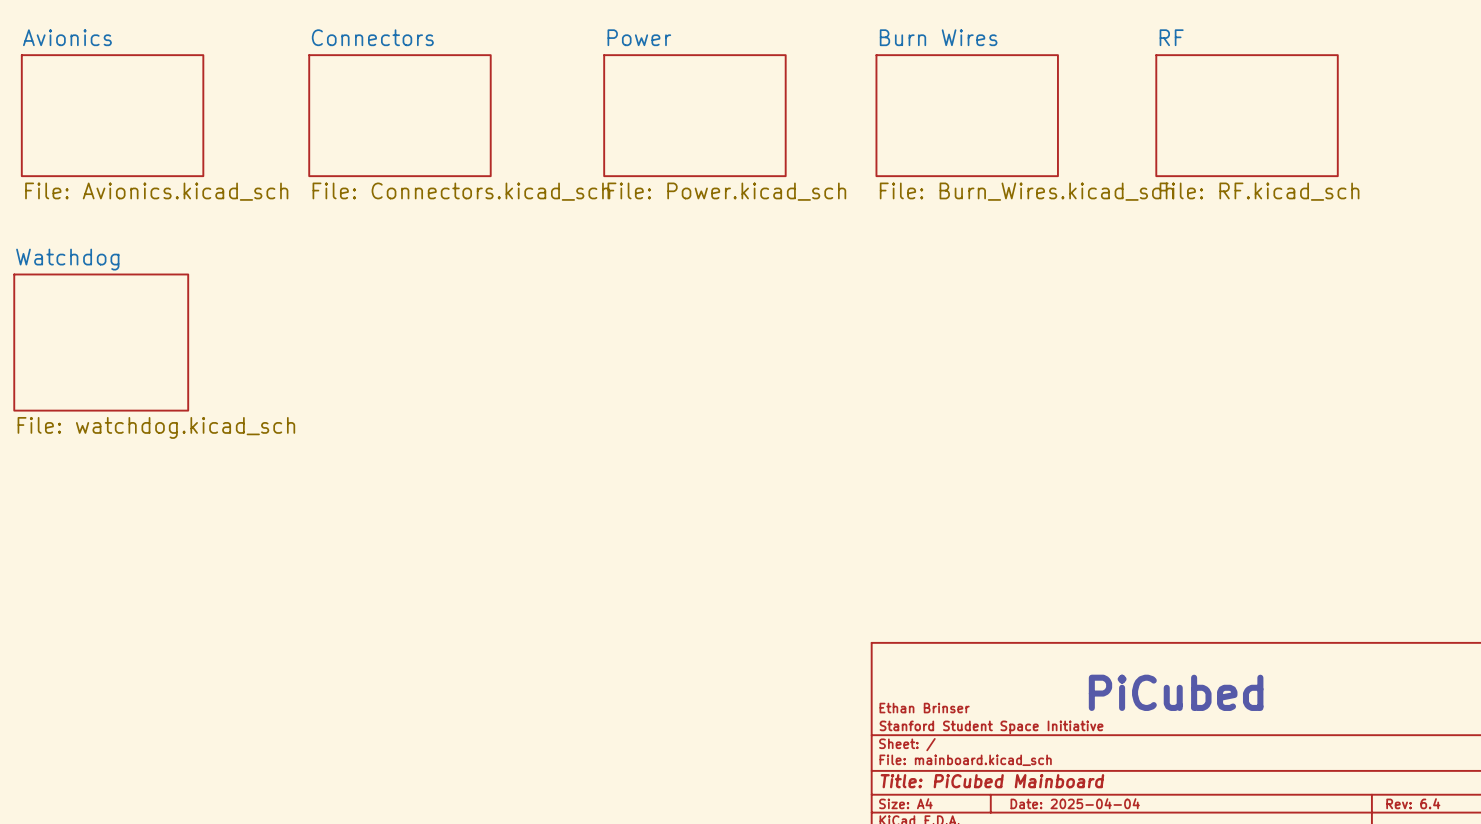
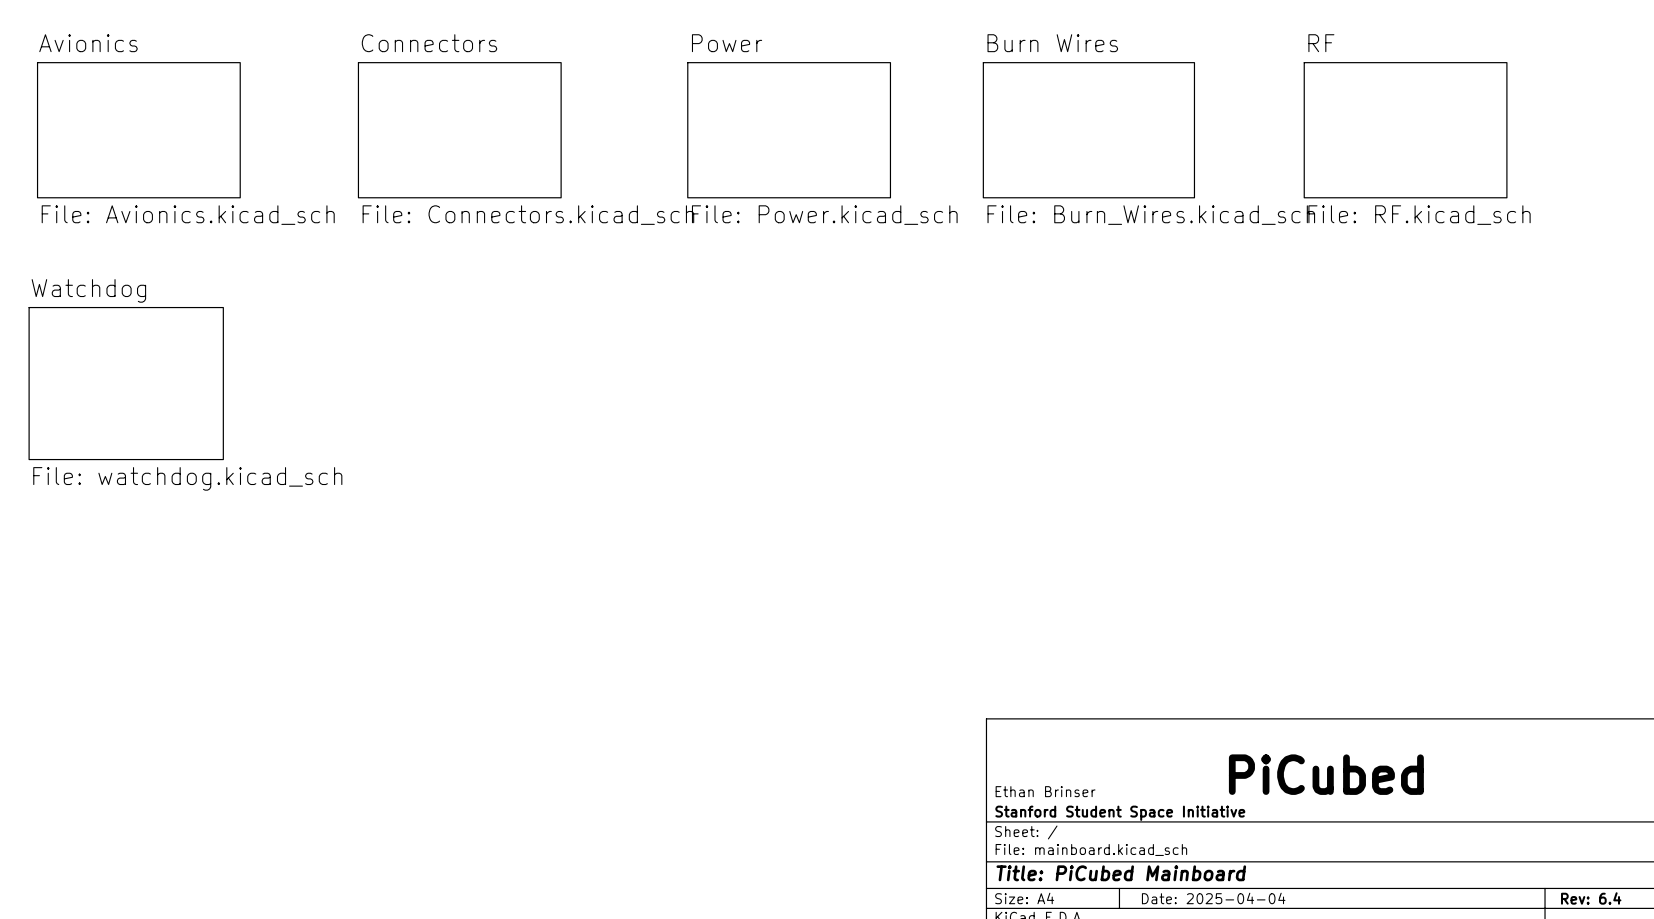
sheet Burn Wires shape: [876, 55, 1058, 177] -> [983, 62, 1195, 198]

